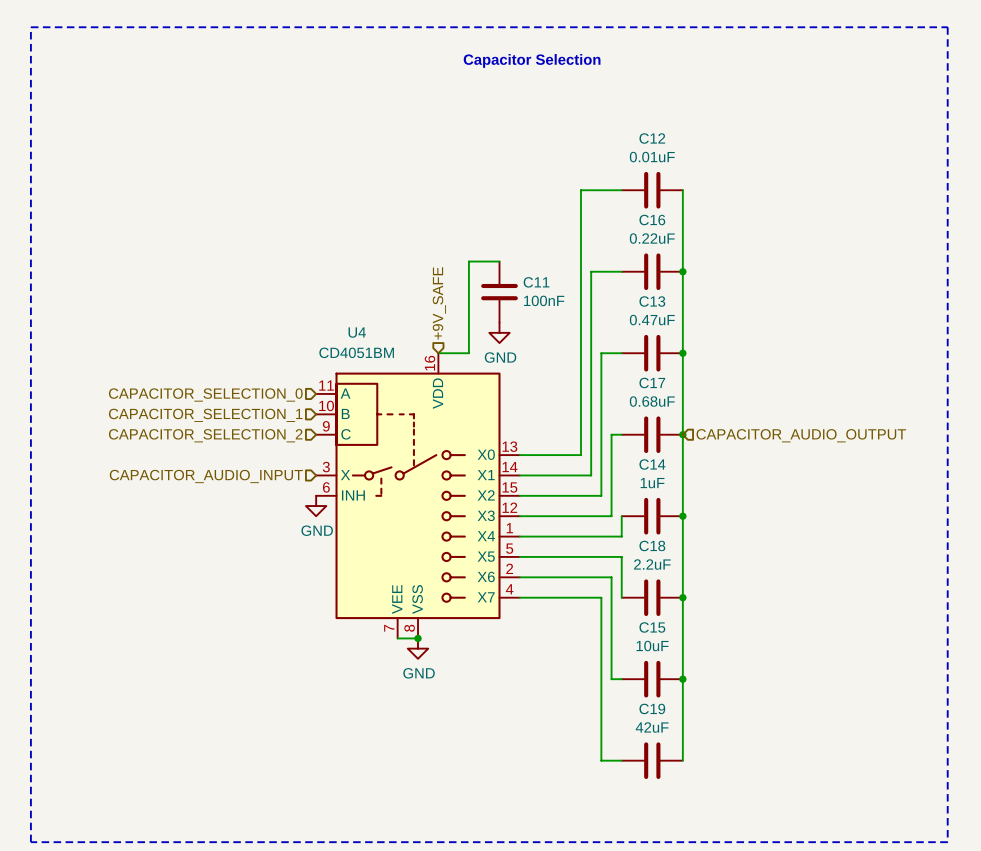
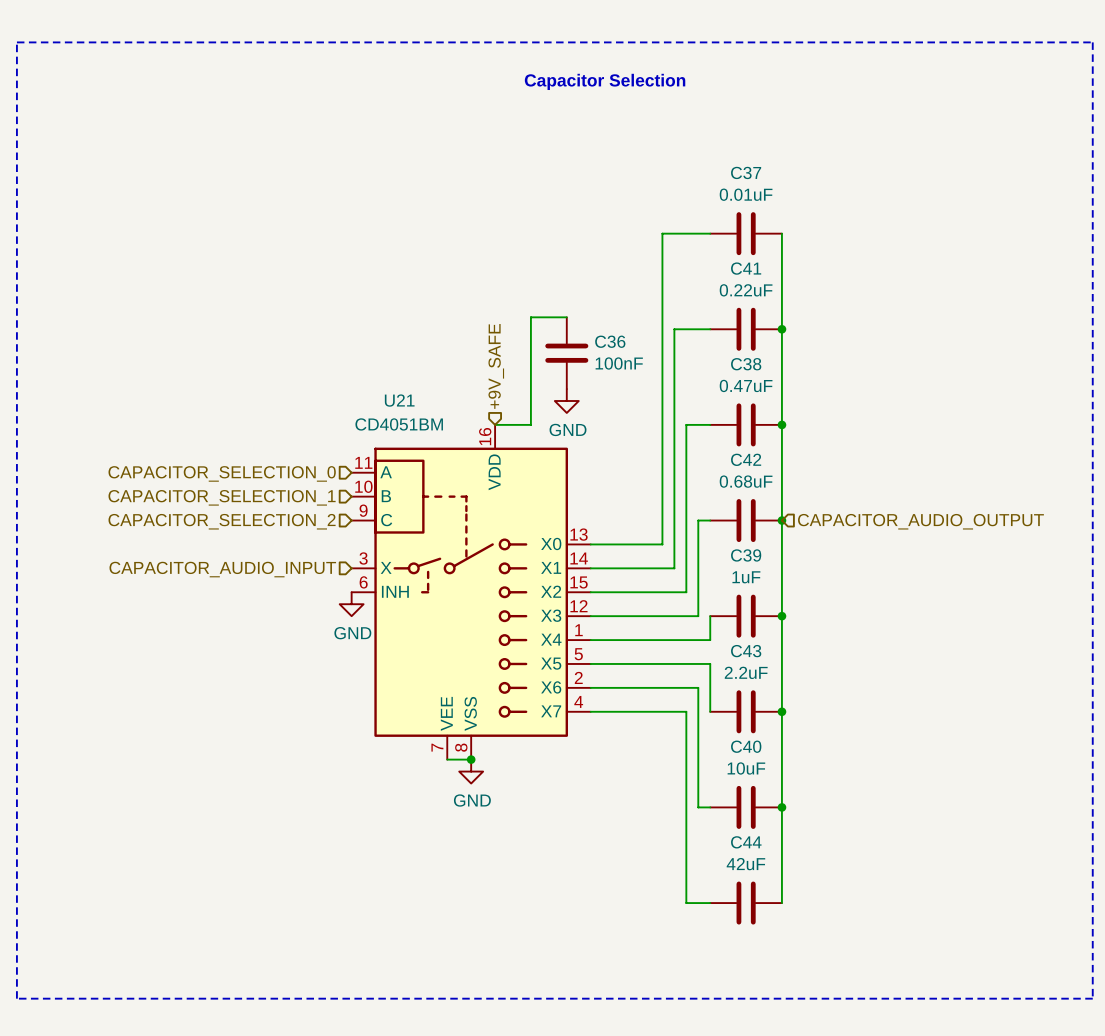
C12 name: C12 (652, 138) -> C37 (746, 172)
C16 name: C16 (652, 220) -> C41 (746, 268)
C11 name: C11 (536, 282) -> C36 (610, 341)
C13 name: C13 (652, 301) -> C38 (746, 364)
U4 name: U4 (357, 332) -> U21 (399, 400)
C17 name: C17 (652, 382) -> C42 (746, 459)
C14 name: C14 (652, 464) -> C39 (746, 555)
C18 name: C18 (652, 545) -> C43 (746, 651)
C15 name: C15 (652, 627) -> C40 (746, 746)
C19 name: C19 (652, 708) -> C44 (746, 842)

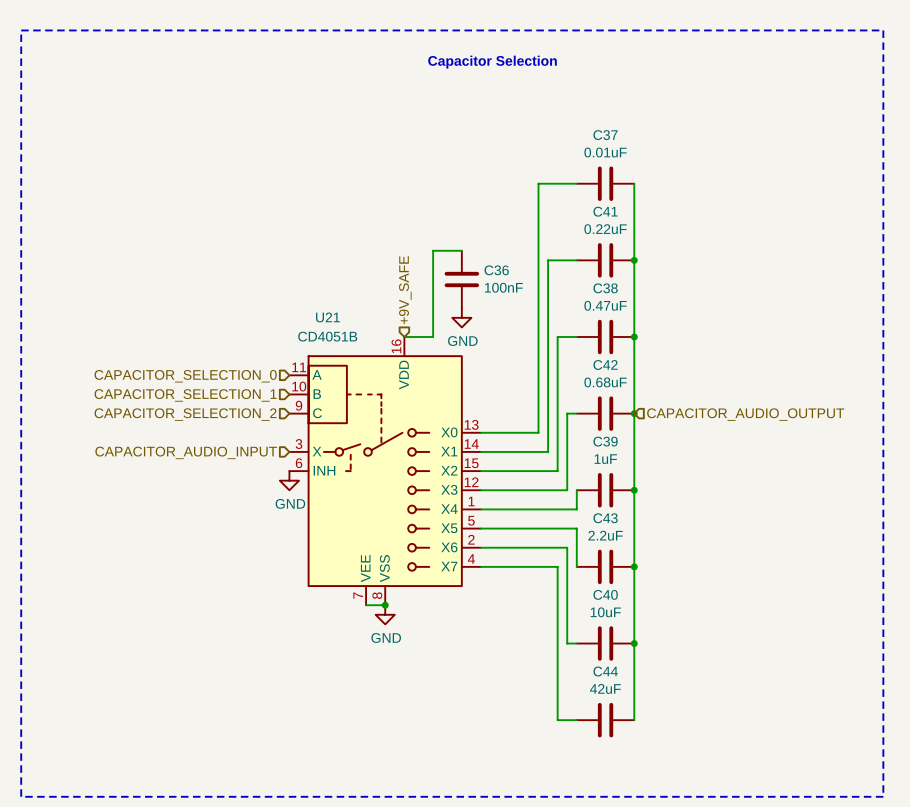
U21 value: CD4051BM (399, 424) -> CD4051B (327, 336)

